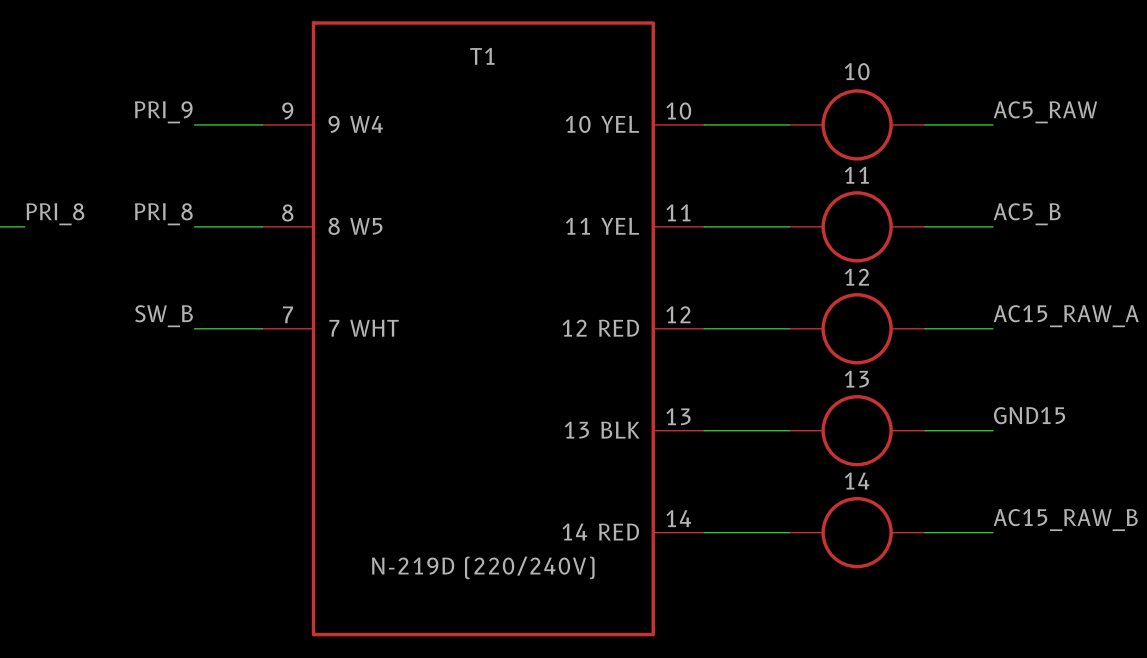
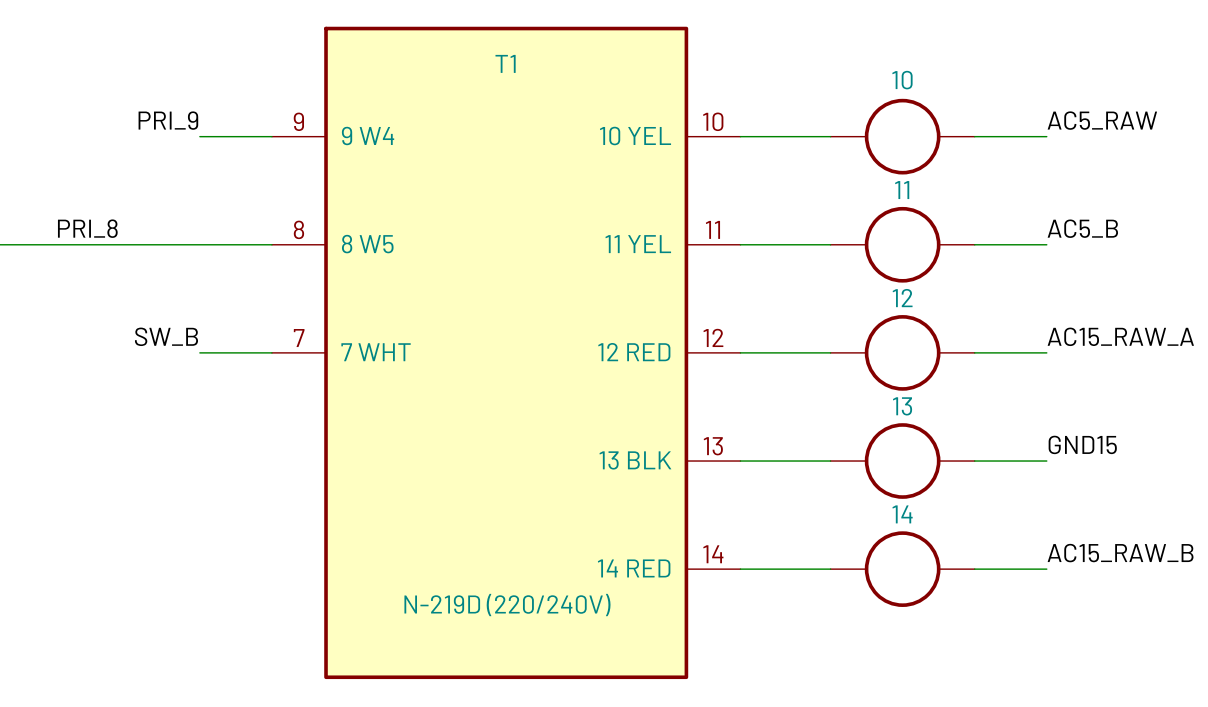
label position: PRI_8 (55, 214) -> PRI_8 (87, 228)
label: PRI_8 (163, 214) -> none
wire: none -> (19, 244) (199, 244)

